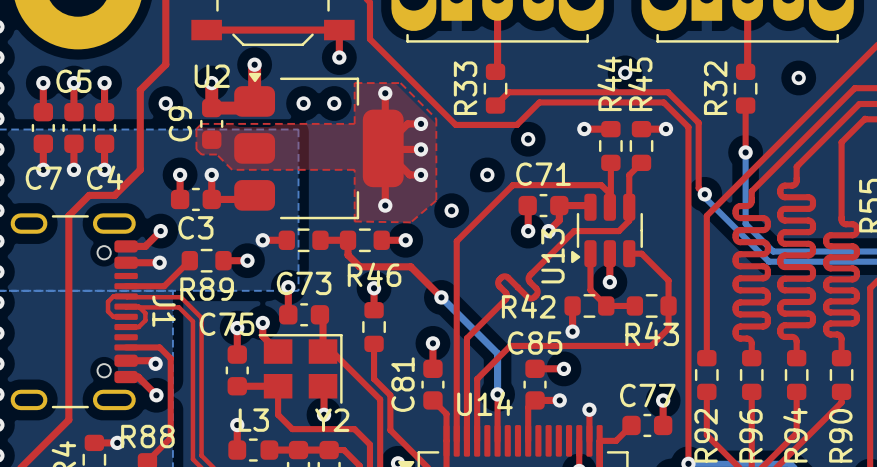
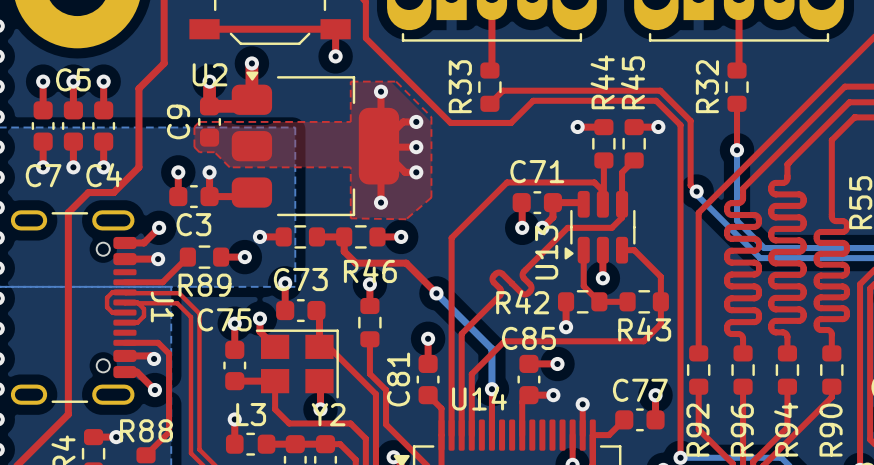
via: (625, 72) -> none
via: (798, 77) -> none
via: (165, 103) -> none
via: (303, 103) -> none
via: (334, 103) -> none
via: (528, 139) -> none
via: (487, 174) -> none
via: (451, 210) -> none

